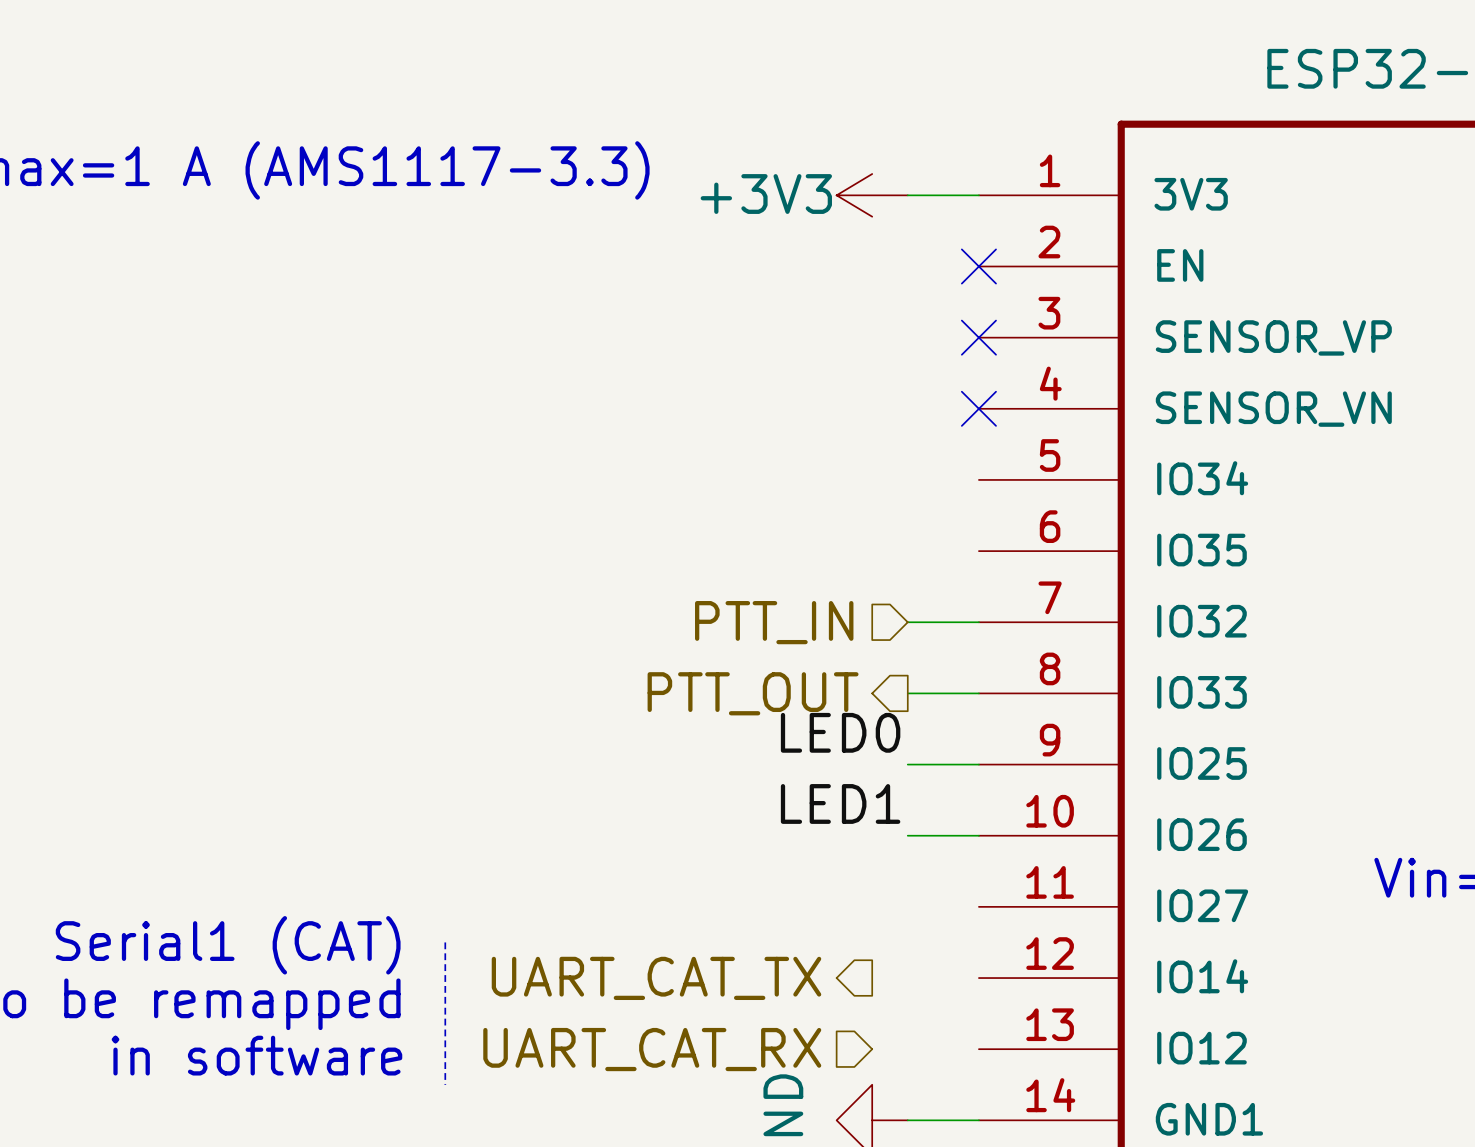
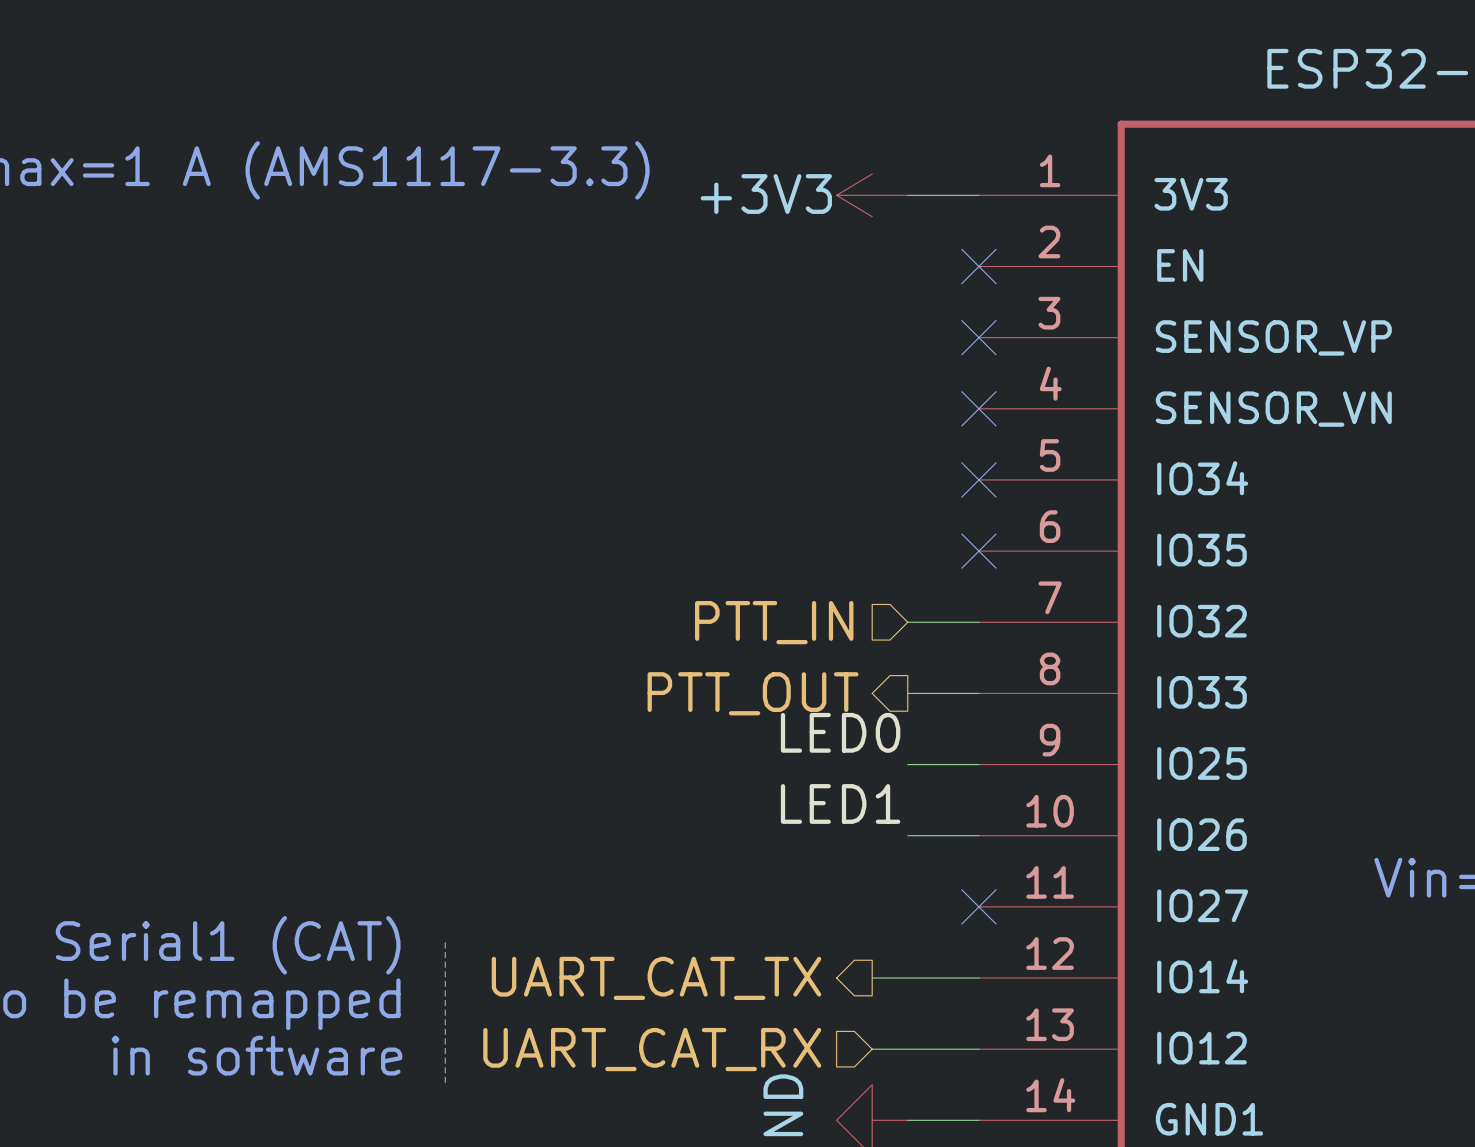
no-connect mark: none -> (978, 479)
no-connect mark: none -> (978, 551)
no-connect mark: none -> (978, 906)
wire: none -> (872, 978) (978, 978)
wire: none -> (872, 1049) (978, 1049)

